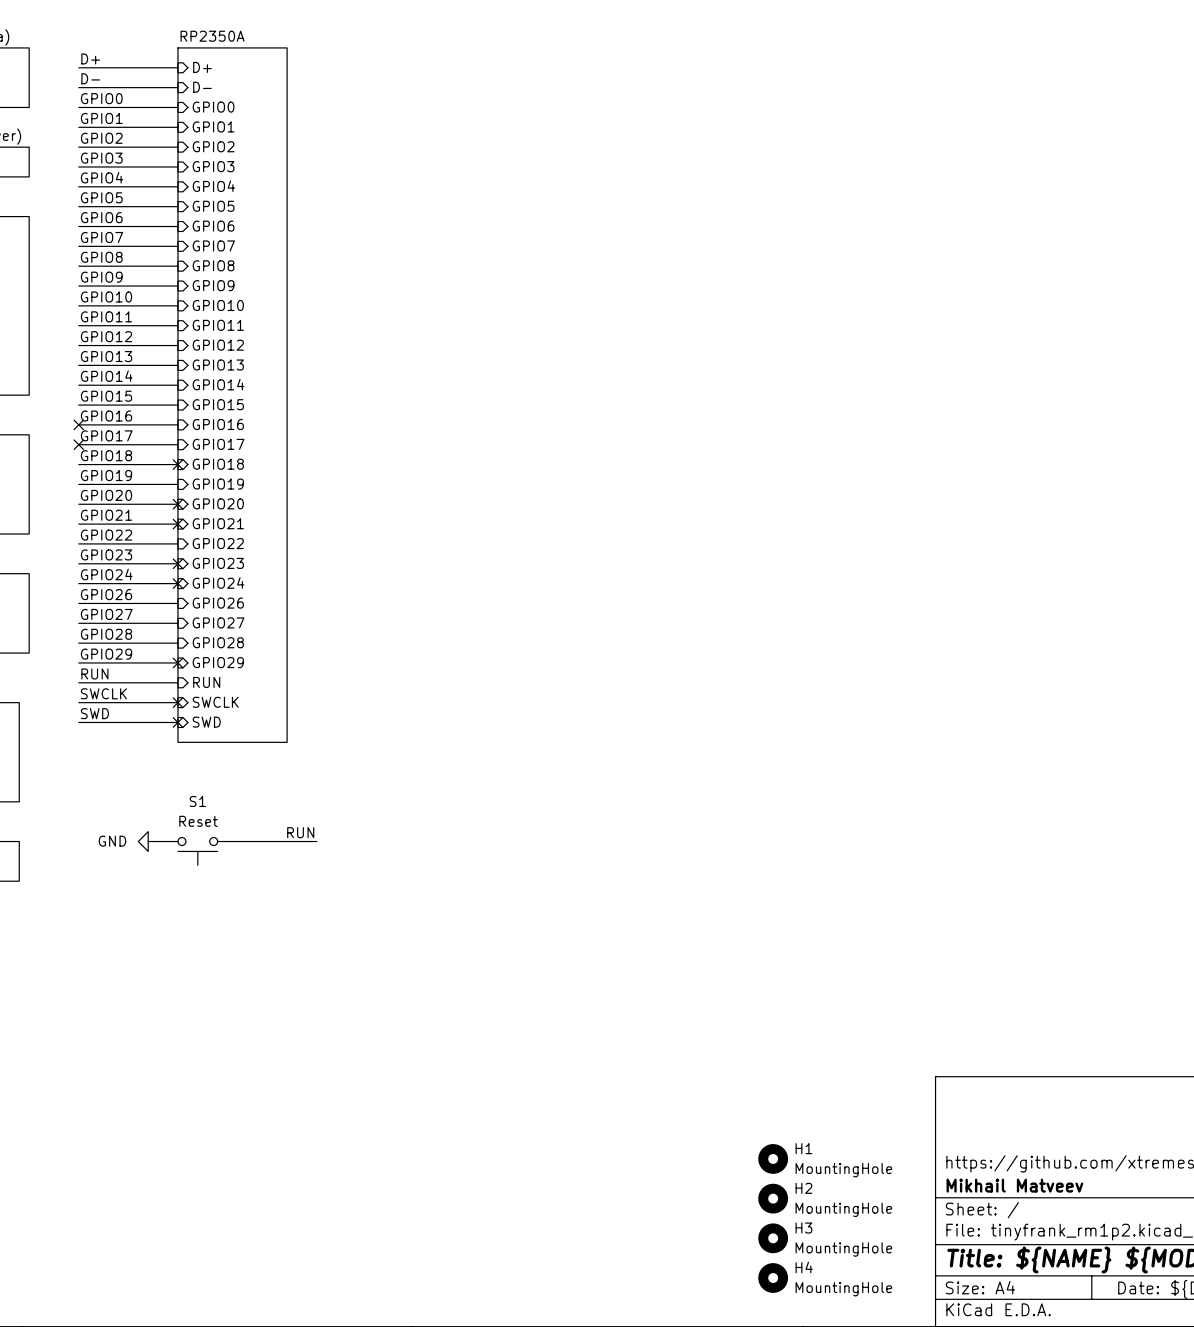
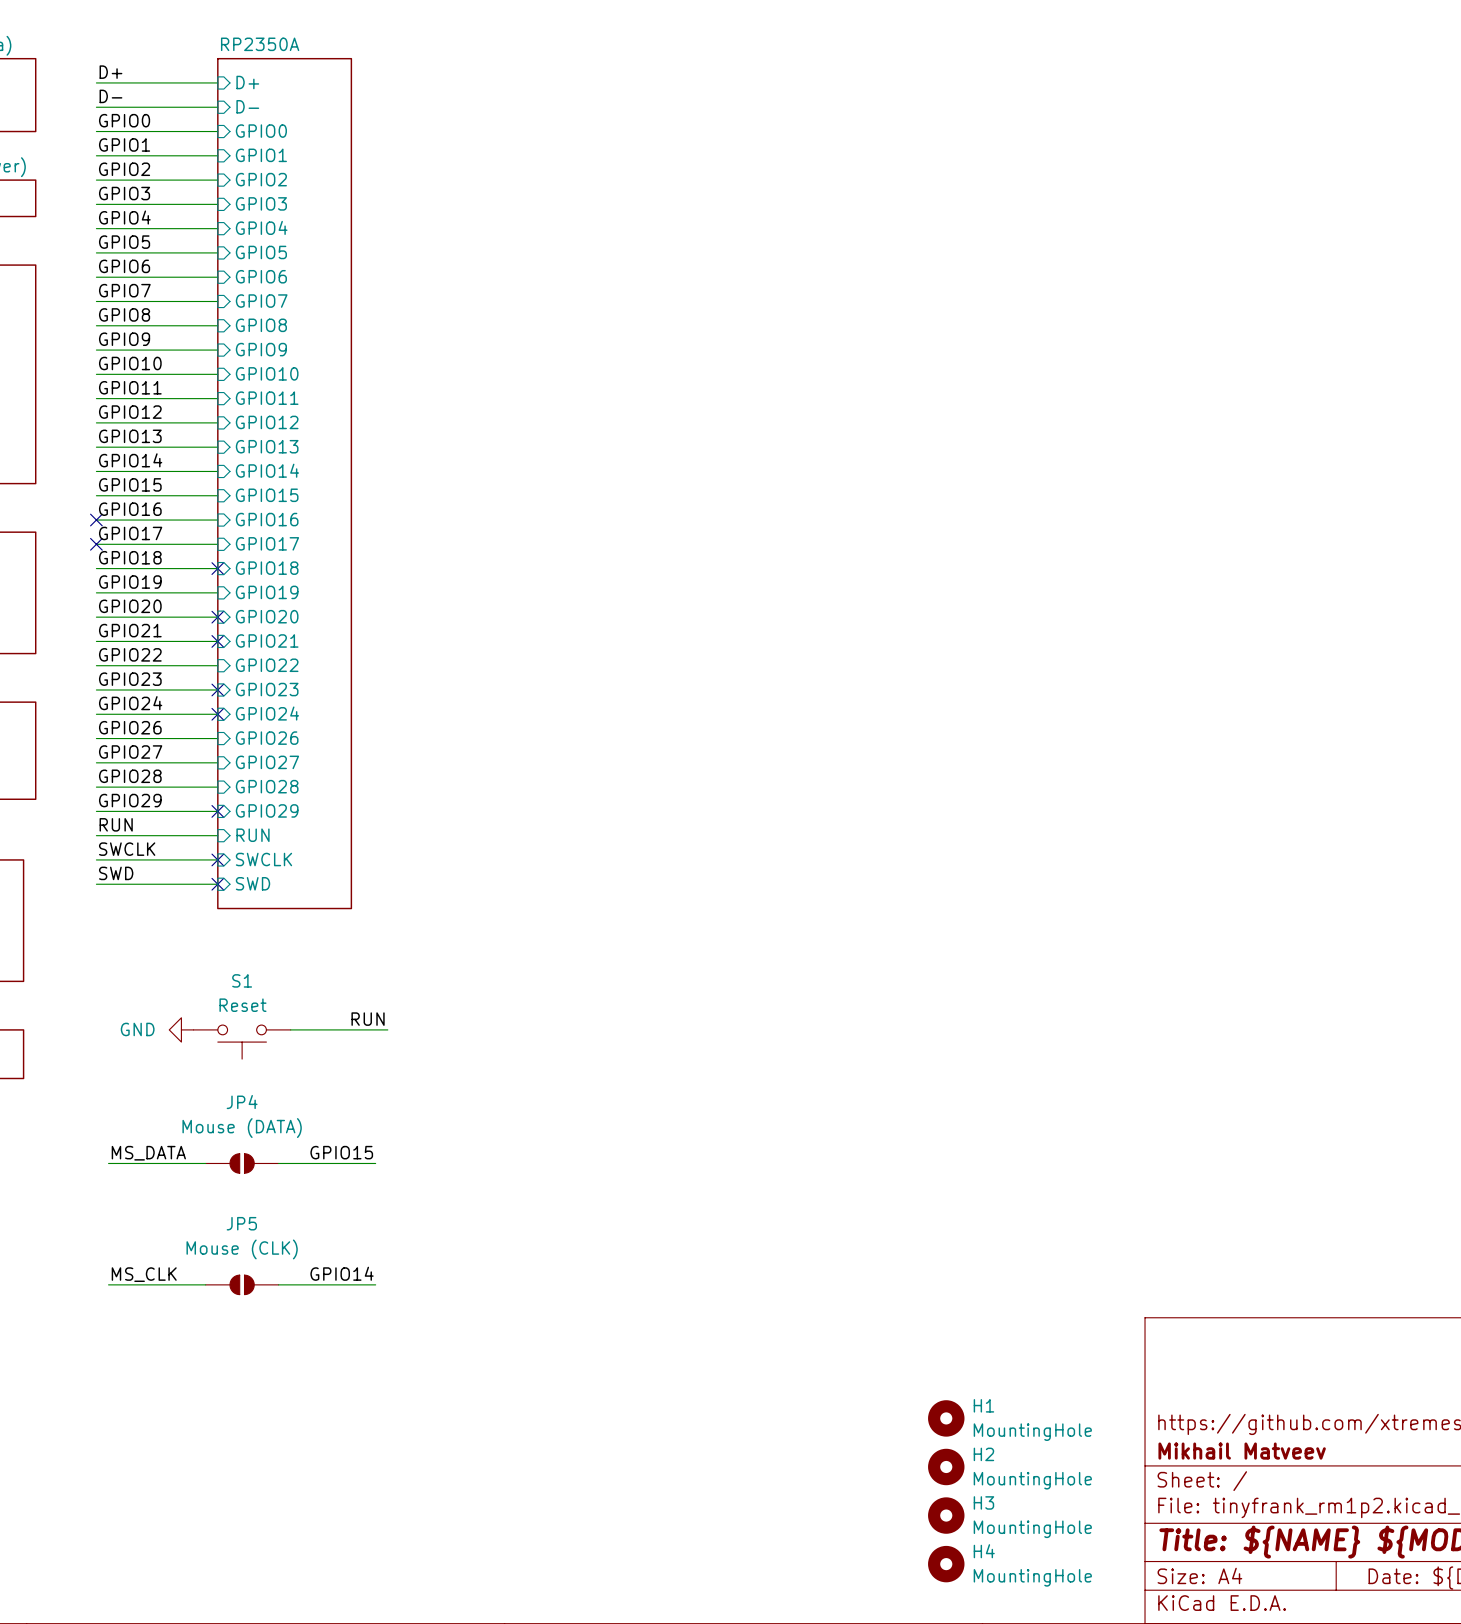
label: none -> GPIO15 (341, 1152)
label: none -> MS_DATA (148, 1153)
wire: none -> (108, 1163) (205, 1163)
JP4: none -> Mouse (DATA) (242, 1163)
wire: none -> (278, 1163) (375, 1163)
label: none -> GPIO14 (342, 1273)
label: none -> MS_CLK (144, 1274)
wire: none -> (108, 1284) (205, 1284)
JP5: none -> Mouse (CLK) (242, 1284)
wire: none -> (278, 1284) (375, 1284)

